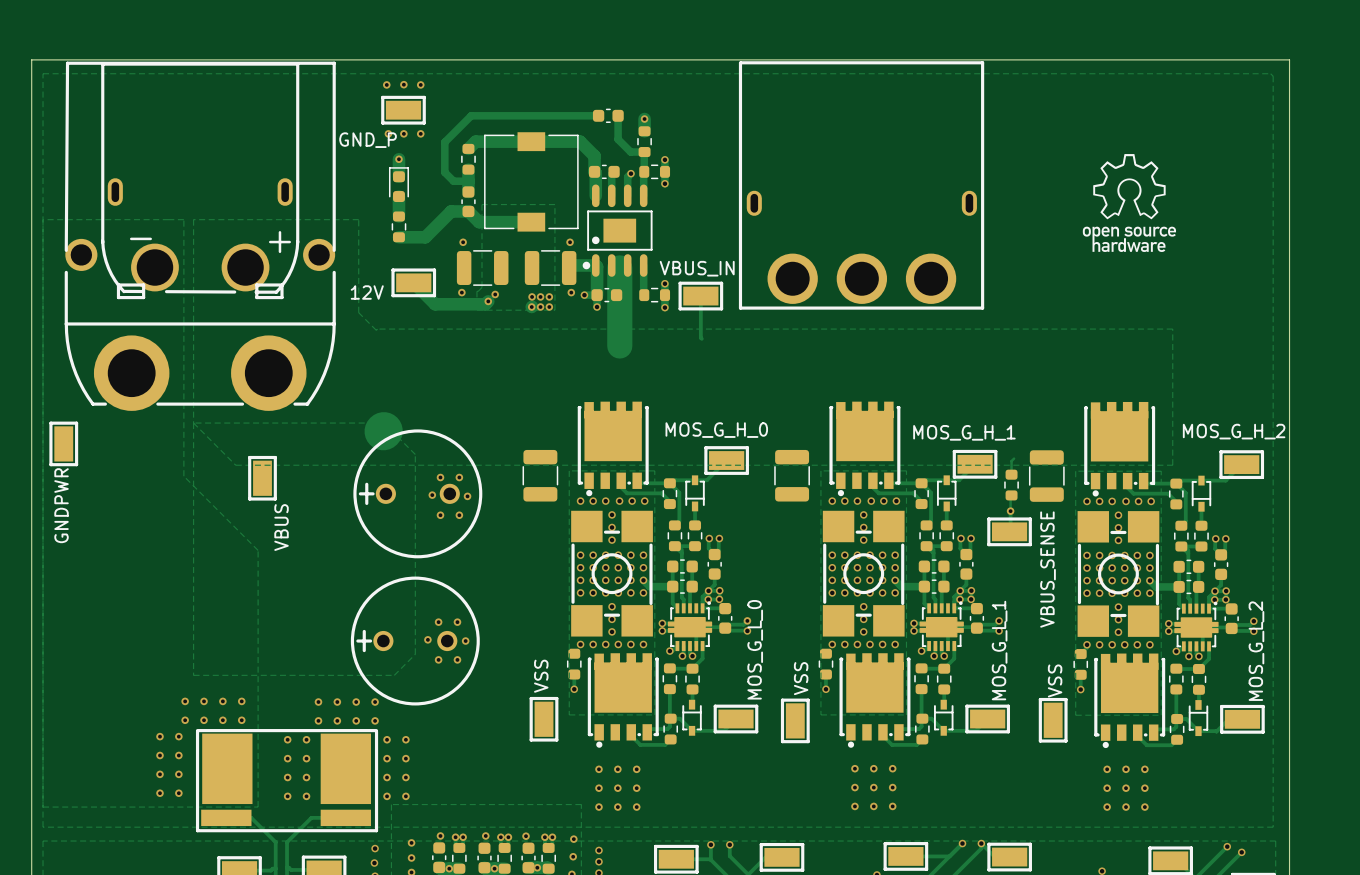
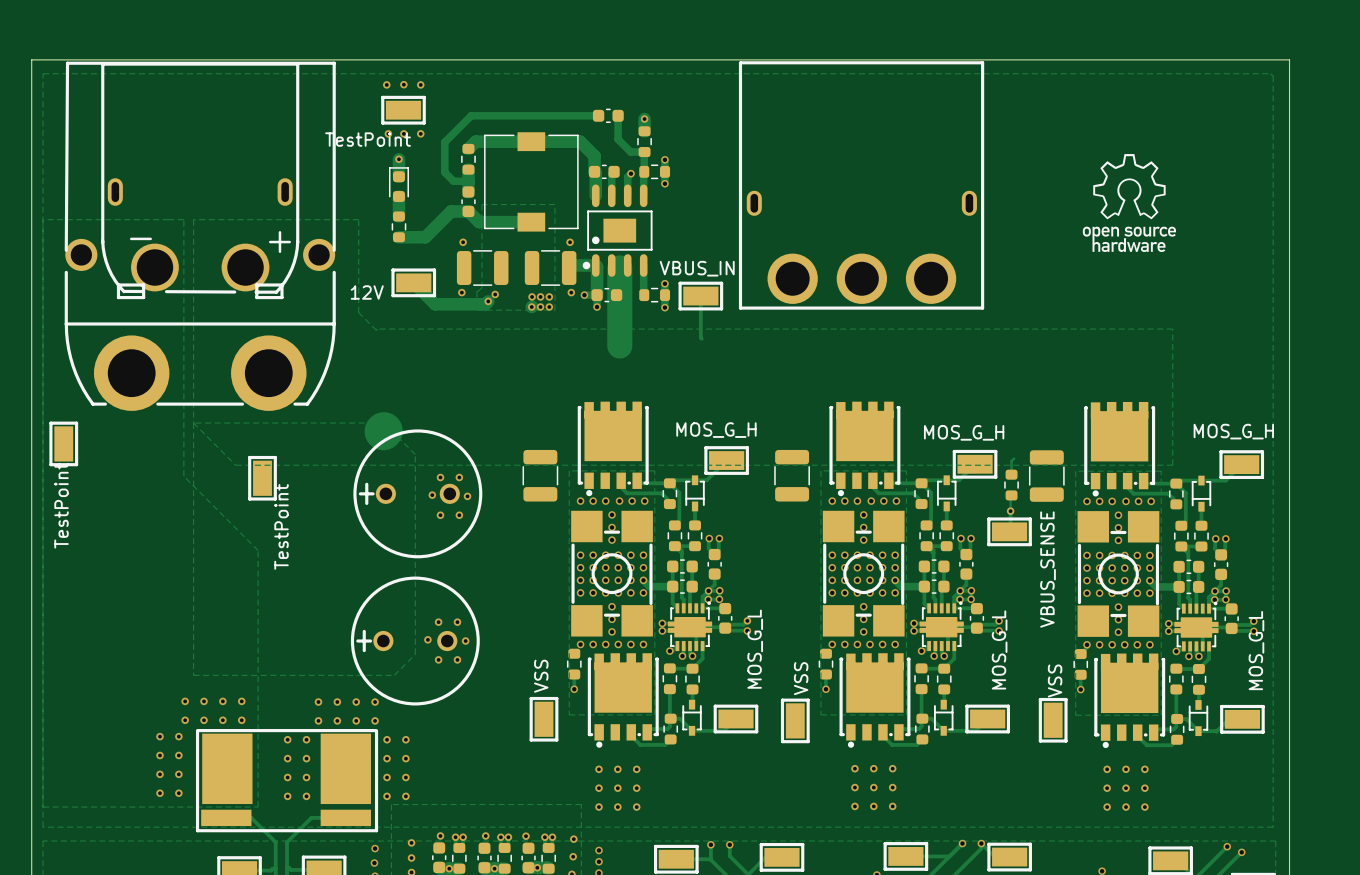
part value: GND_P (368, 140) -> TestPoint (368, 139)
part value: MOS_G_H_0 (716, 430) -> MOS_G_H (716, 430)
part value: MOS_G_H_2 (1234, 431) -> MOS_G_H (1233, 431)
part value: MOS_G_H_1 (964, 432) -> MOS_G_H (964, 432)
part value: GNDPWR (61, 505) -> TestPoint (61, 505)
part value: VBUS (281, 527) -> TestPoint (281, 526)
part value: MOS_G_L_0 (755, 649) -> MOS_G_L (755, 649)
part value: MOS_G_L_1 (999, 650) -> MOS_G_L (999, 649)
part value: MOS_G_L_2 (1256, 651) -> MOS_G_L (1256, 650)

